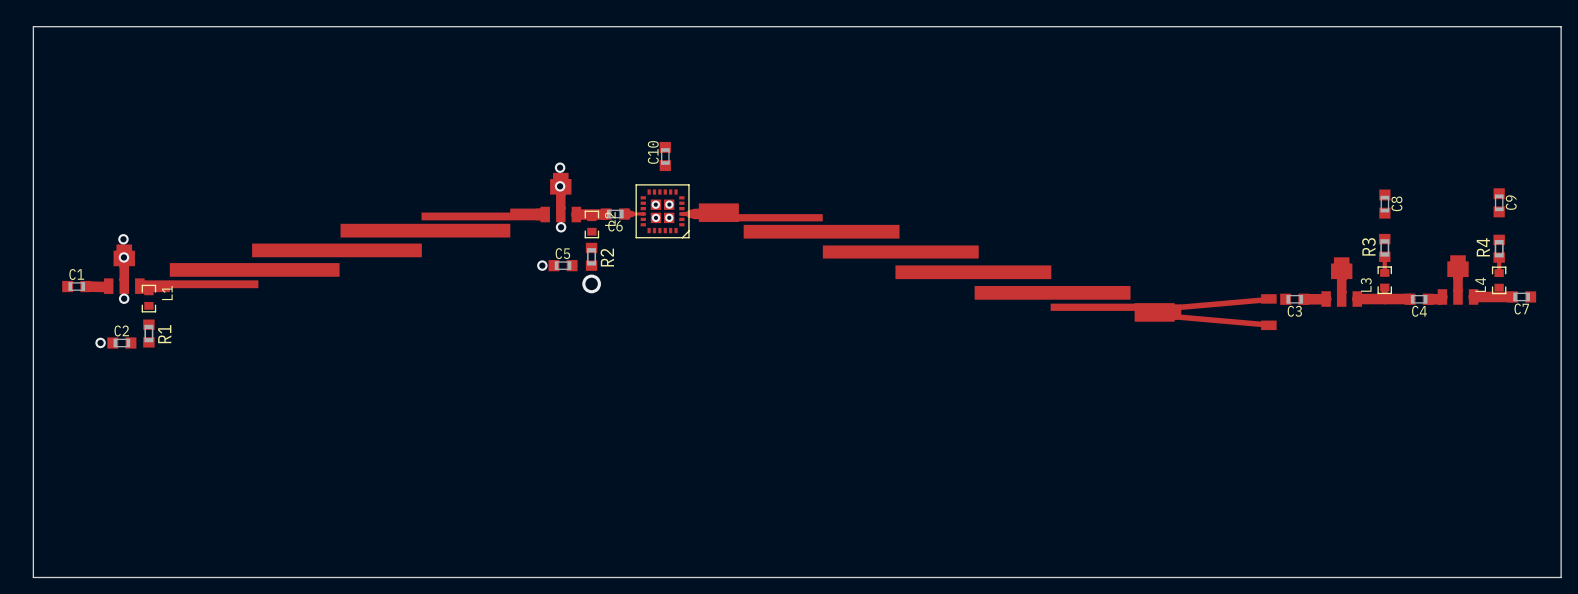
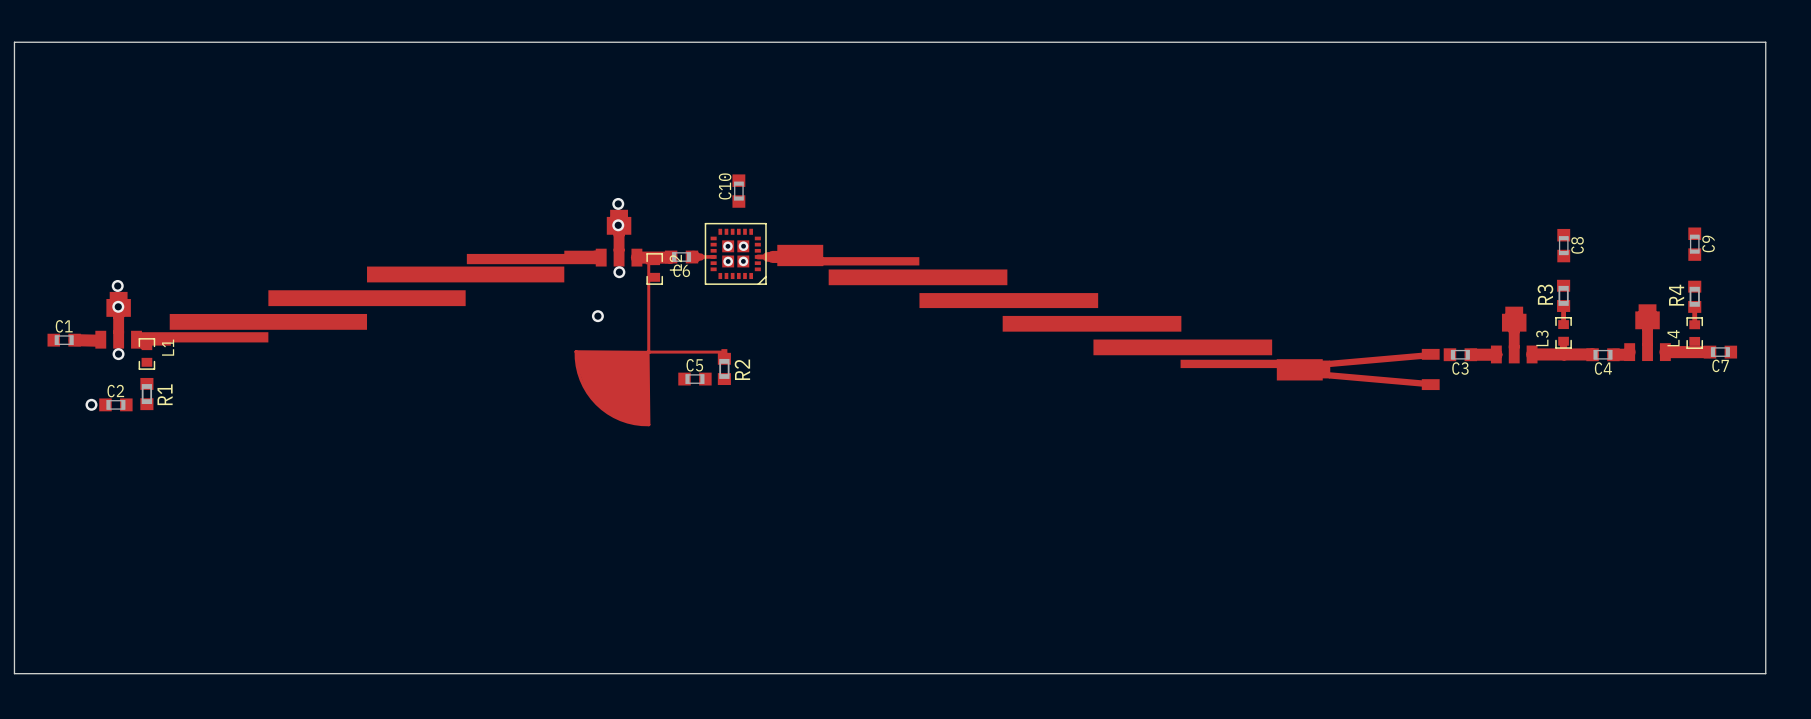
part footprint: [138, 208, 542, 293] -> [135, 250, 600, 346]
R2 position: (591, 256) -> (724, 368)
C5 position: (563, 265) -> (694, 379)
via: (591, 283) -> none
part: none -> (650, 342)

